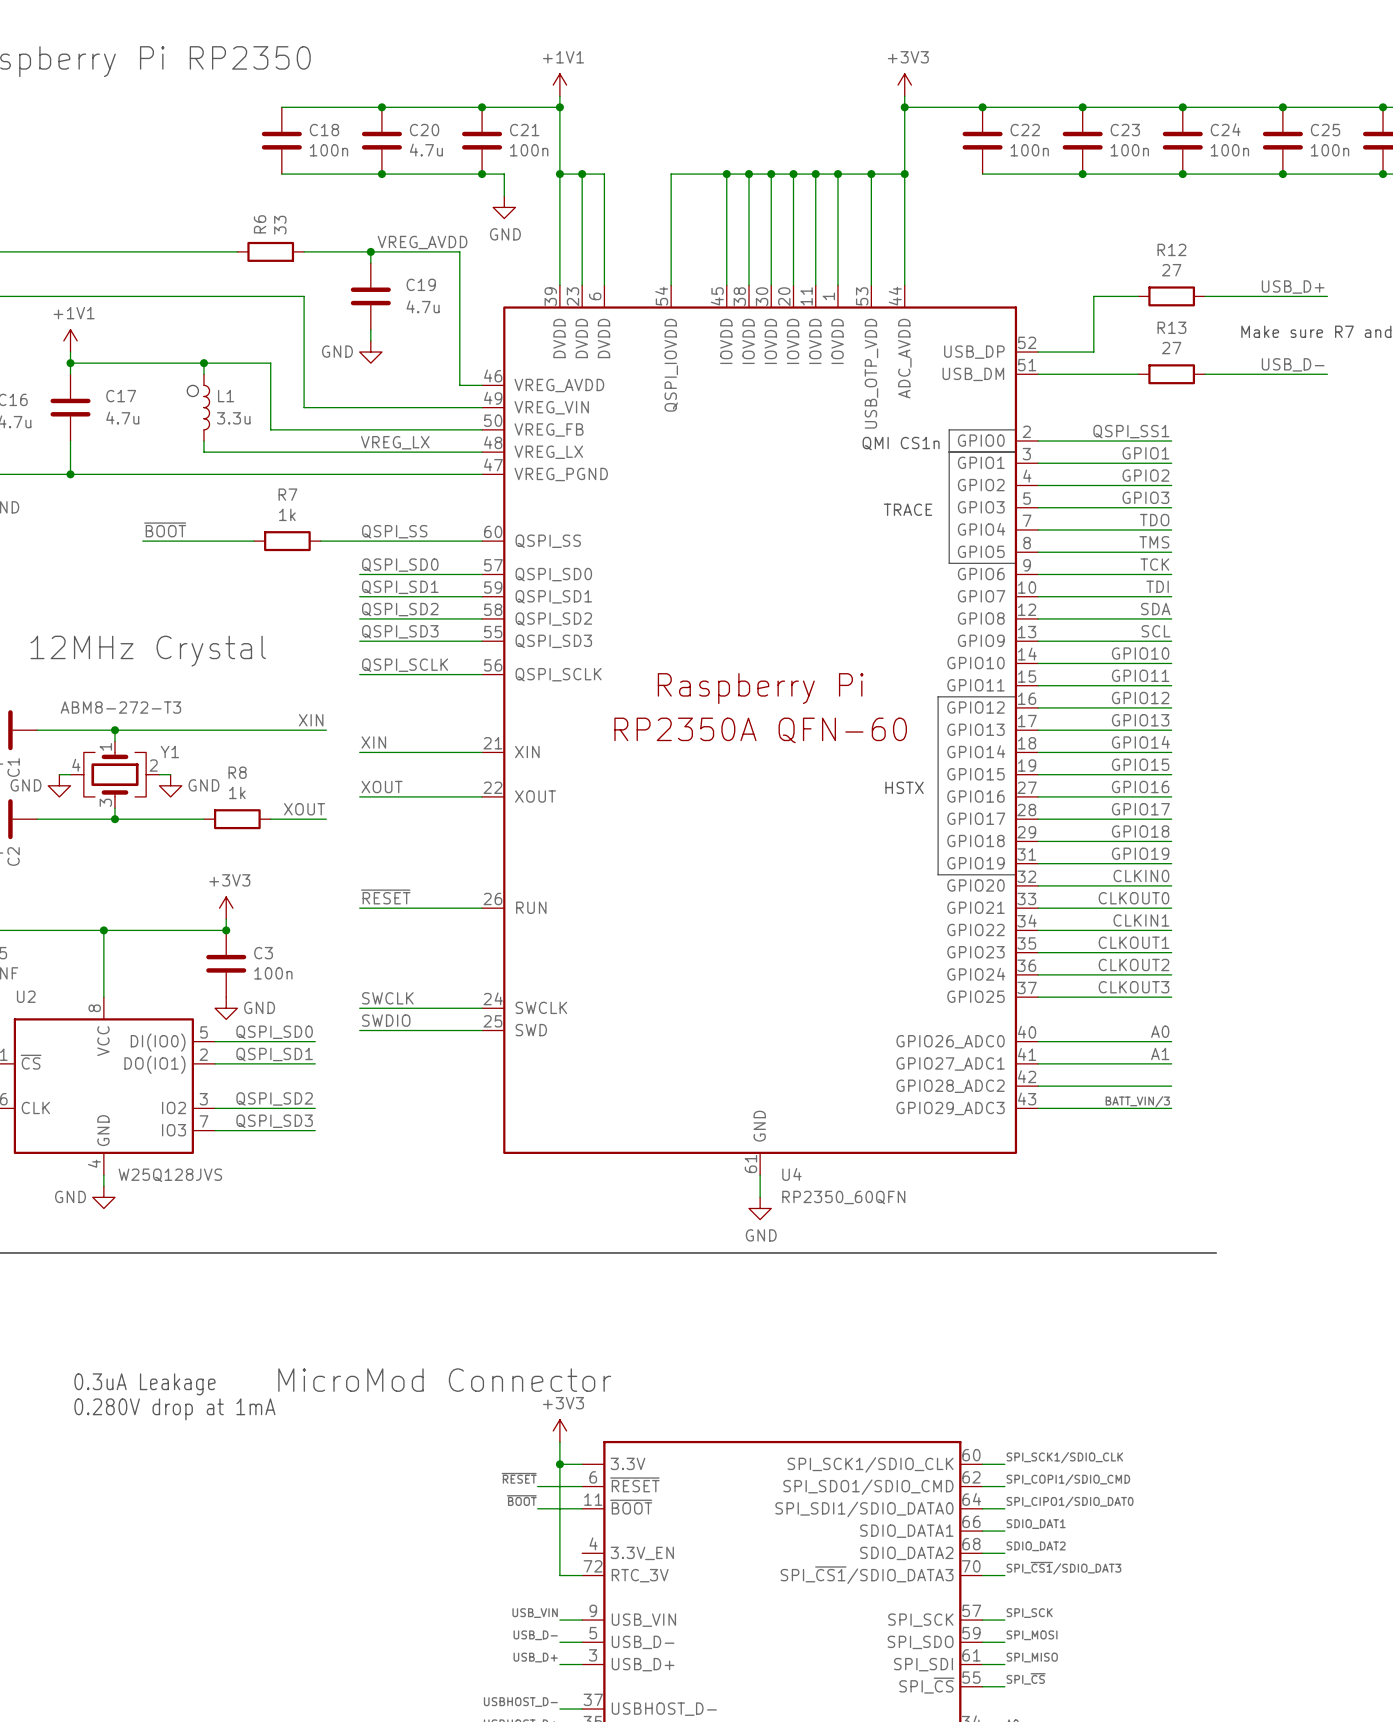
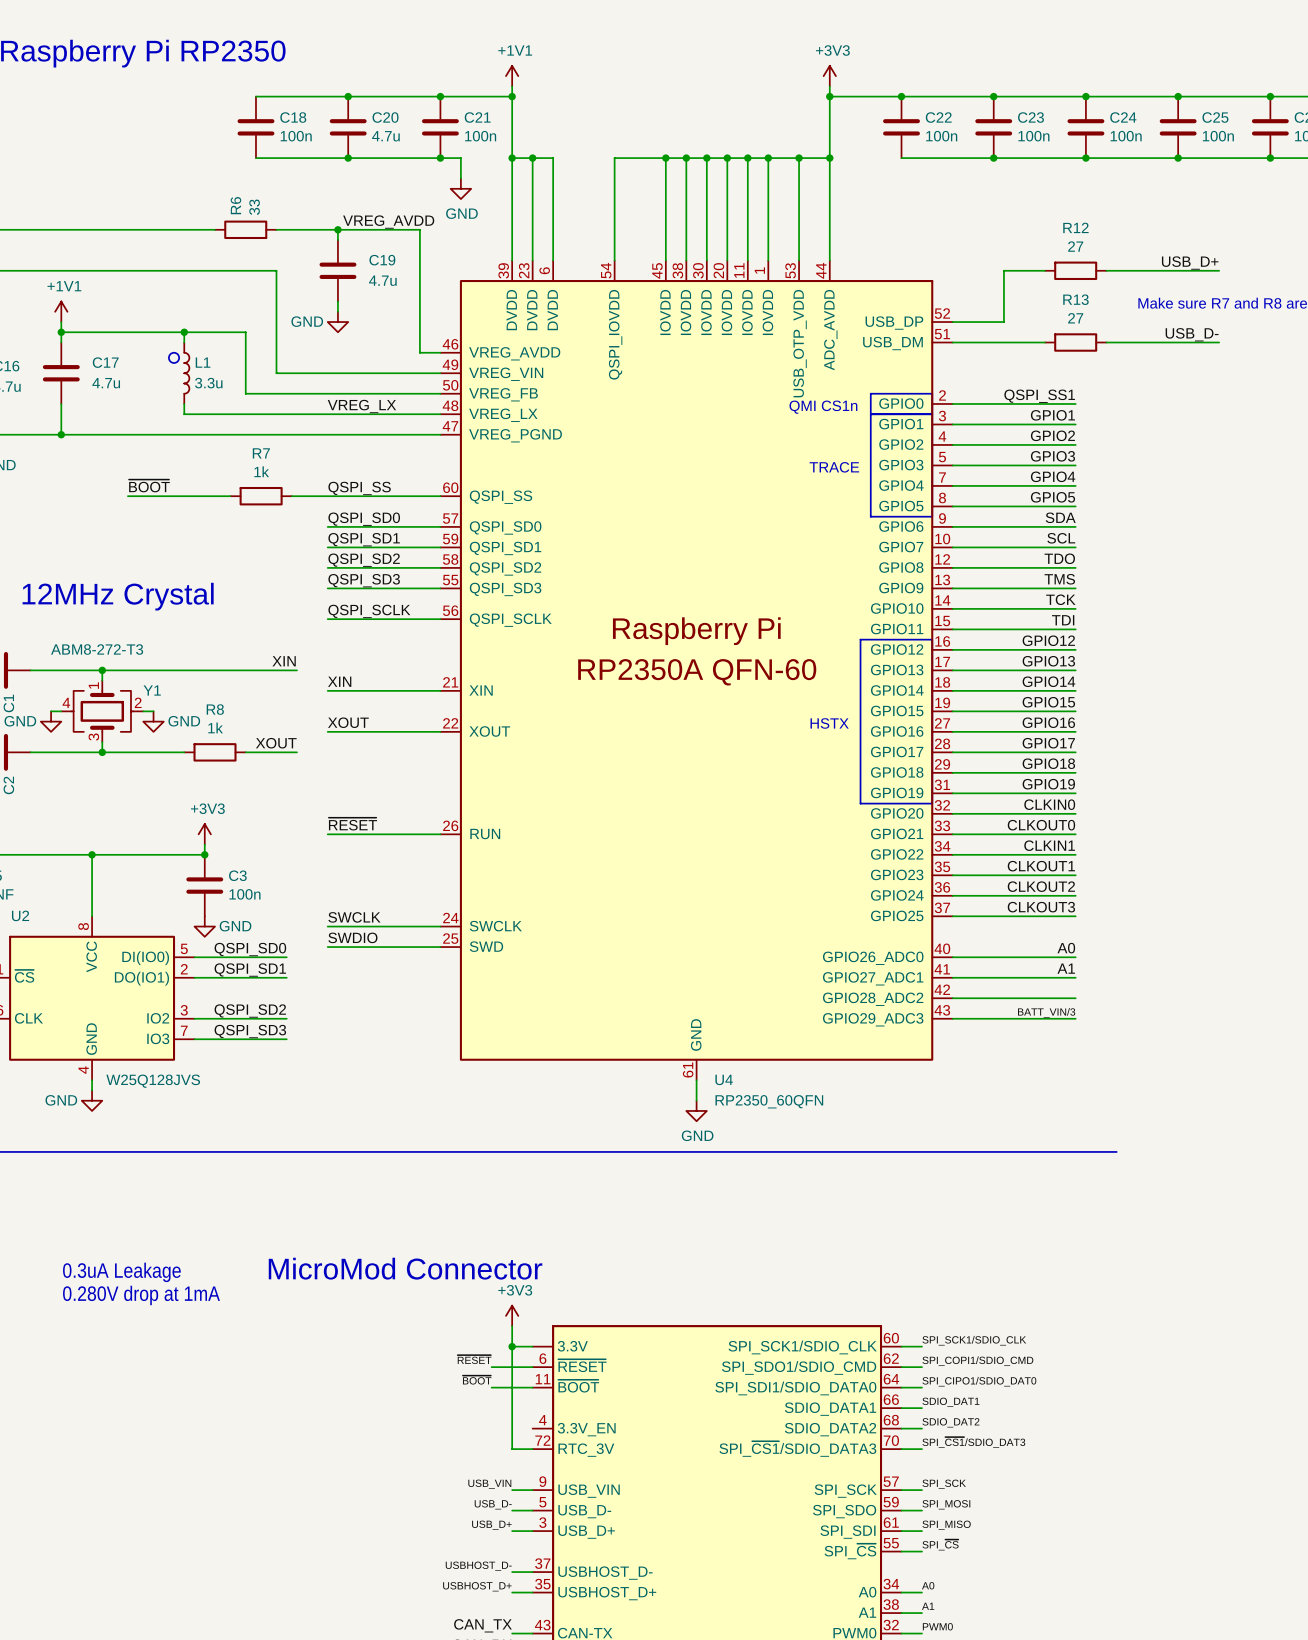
label: TDO (1154, 520) -> GPIO4 (1053, 476)
label: TMS (1154, 542) -> GPIO5 (1052, 497)
label: TCK (1154, 564) -> SDA (1060, 517)
label: TDI (1157, 586) -> SCL (1061, 538)
label: SDA (1155, 609) -> TDO (1059, 558)
label: SCL (1155, 631) -> TMS (1059, 579)
label: GPIO10 (1140, 653) -> TCK (1060, 599)
label: GPIO11 (1140, 675) -> TDI (1063, 620)

